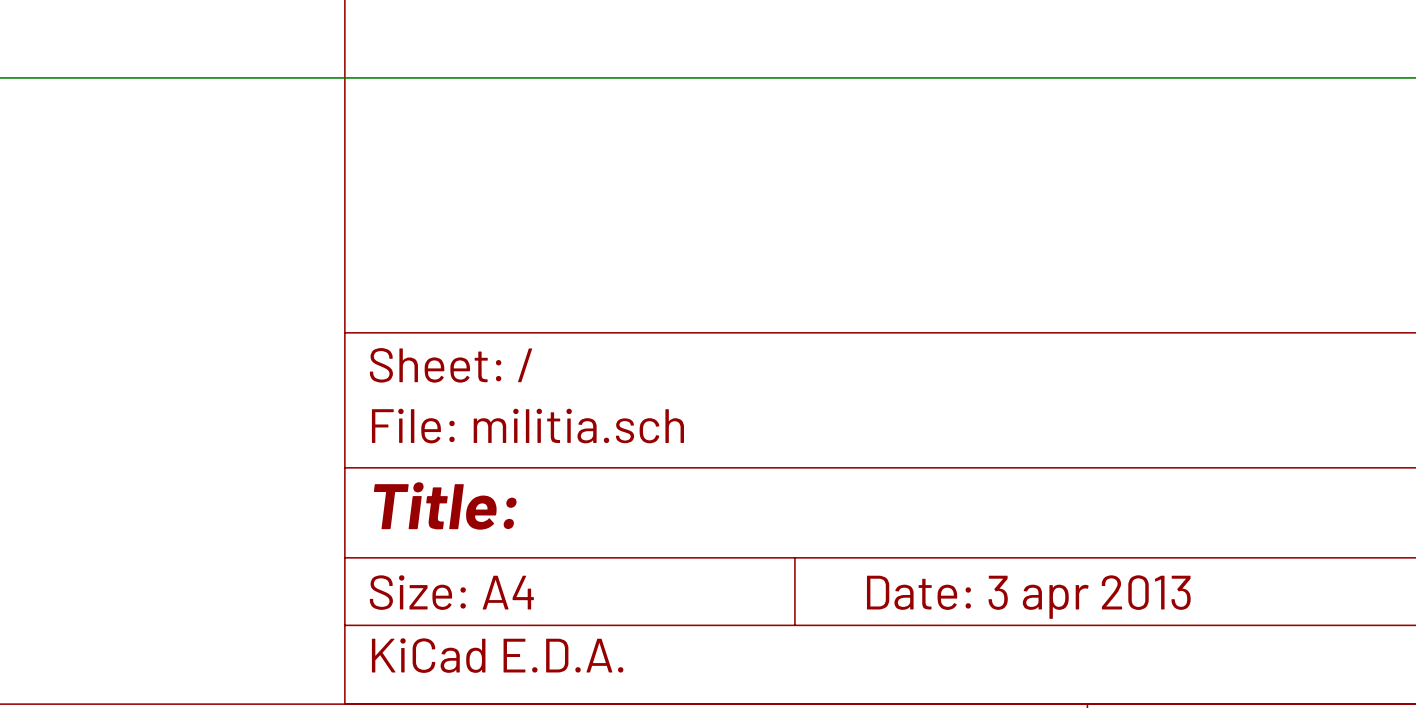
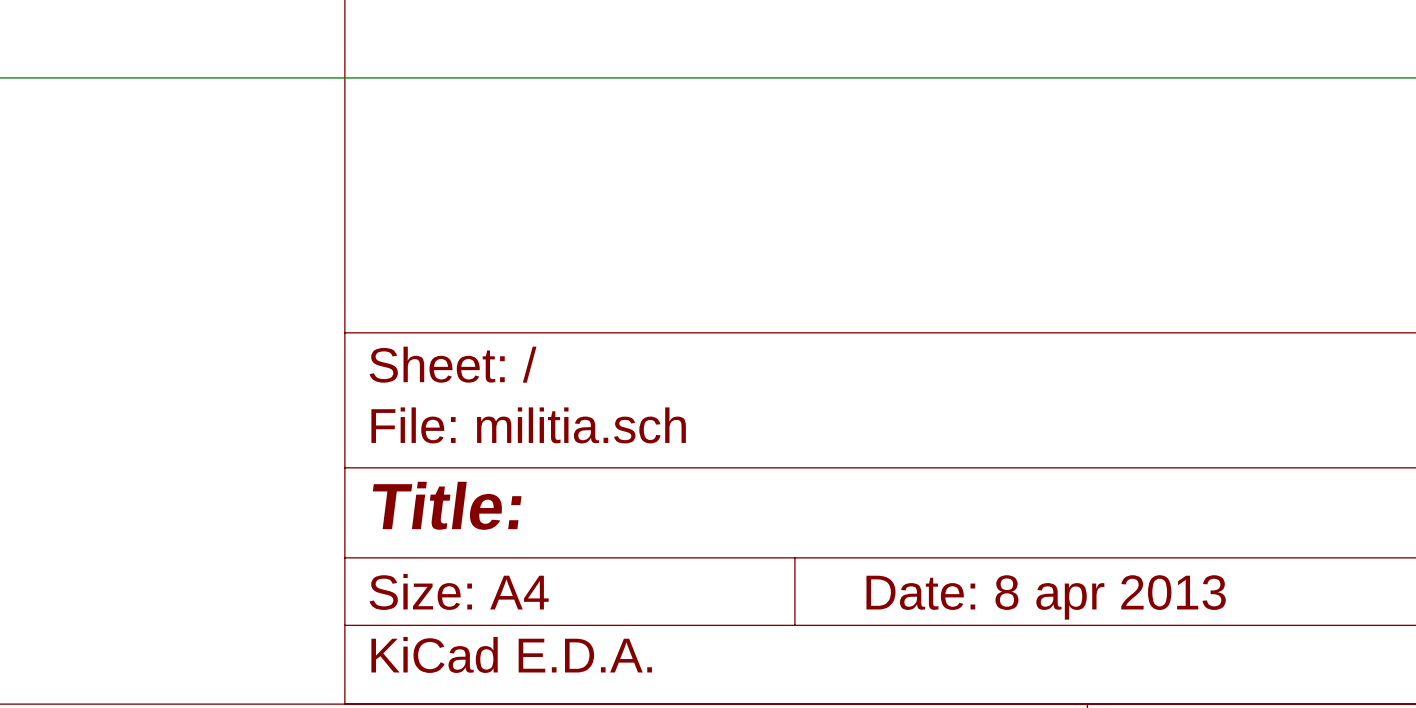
title block: Date: 3 apr 2013 (1028, 597) -> Date: 8 apr 2013 (1046, 597)

